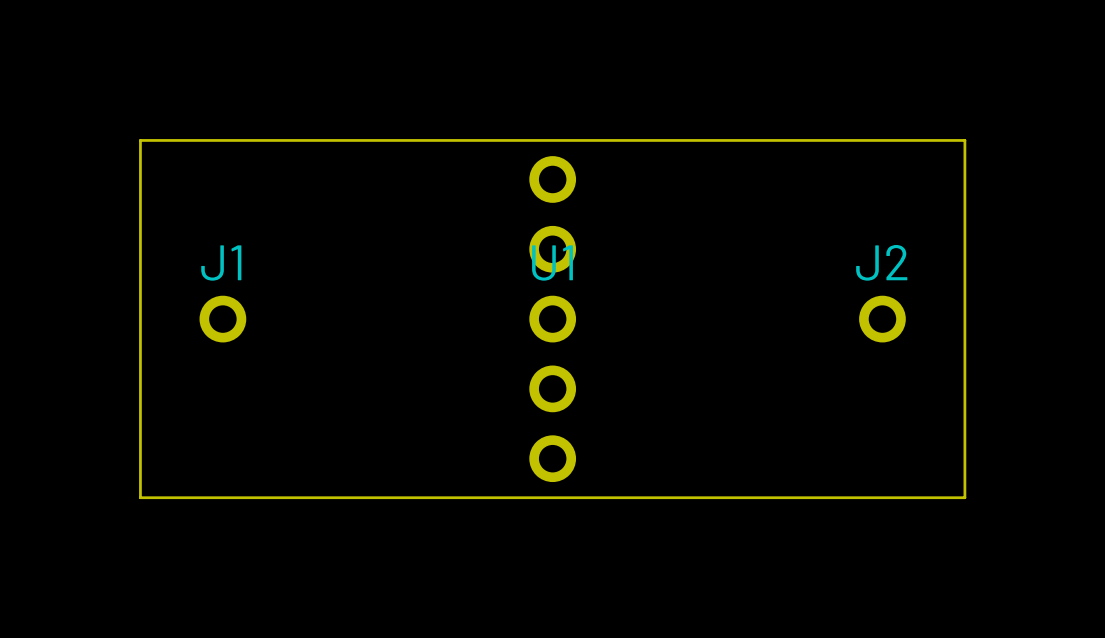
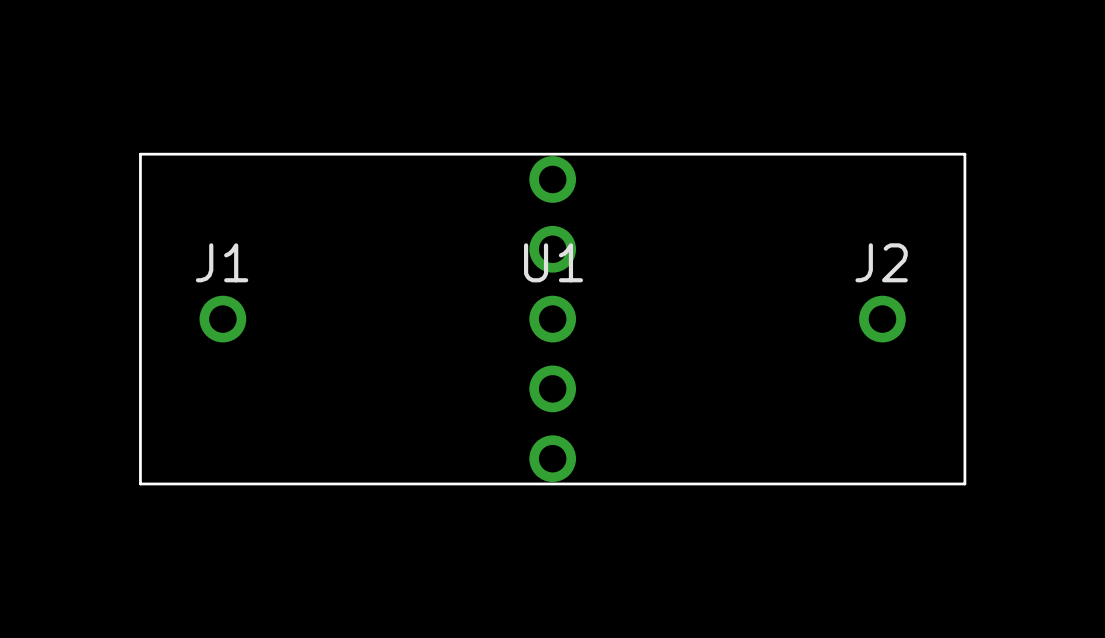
board edge: (140, 154) (140, 140) (964, 140) (964, 154) -> (140, 154) (964, 154)
board edge: (140, 483) (140, 497) (964, 497) (964, 483) -> (140, 483) (964, 483)

